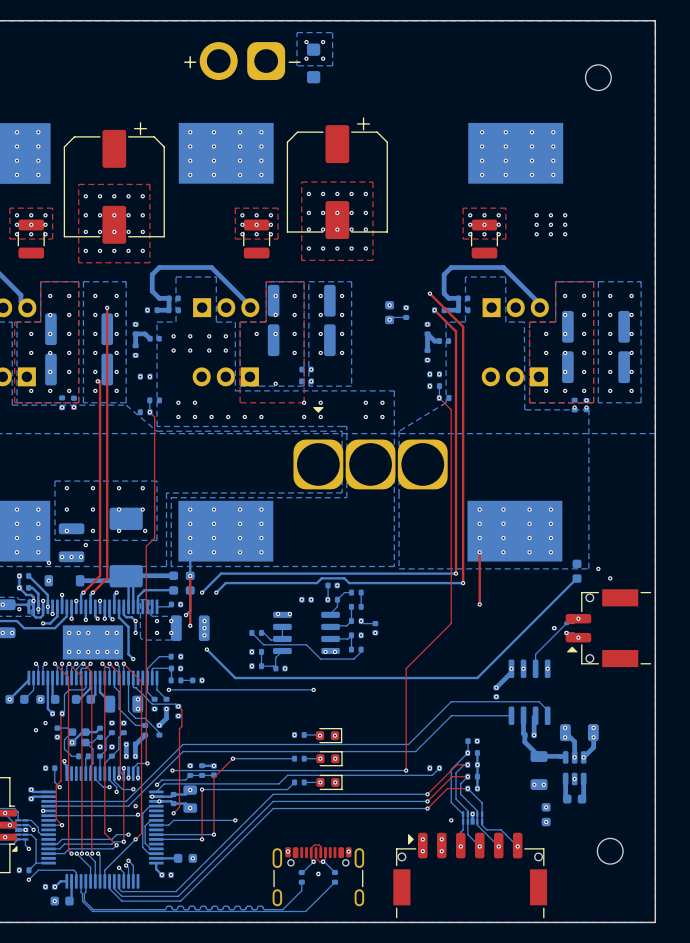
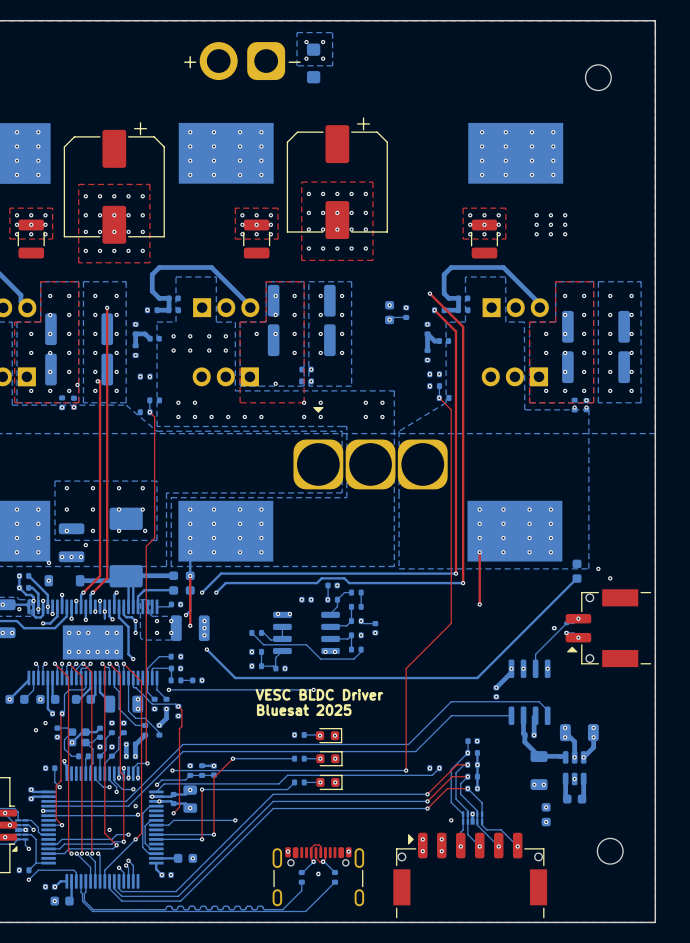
via: none -> (77, 384)
bottom track: (95, 611) (95, 616) (97, 618) -> none
via: none -> (95, 611)
via: none -> (104, 611)
via: (97, 618) -> none
via: (104, 618) -> none
text: none -> VESC BLDC Driver (319, 694)
text: none -> Bluesat 2025 (304, 710)

